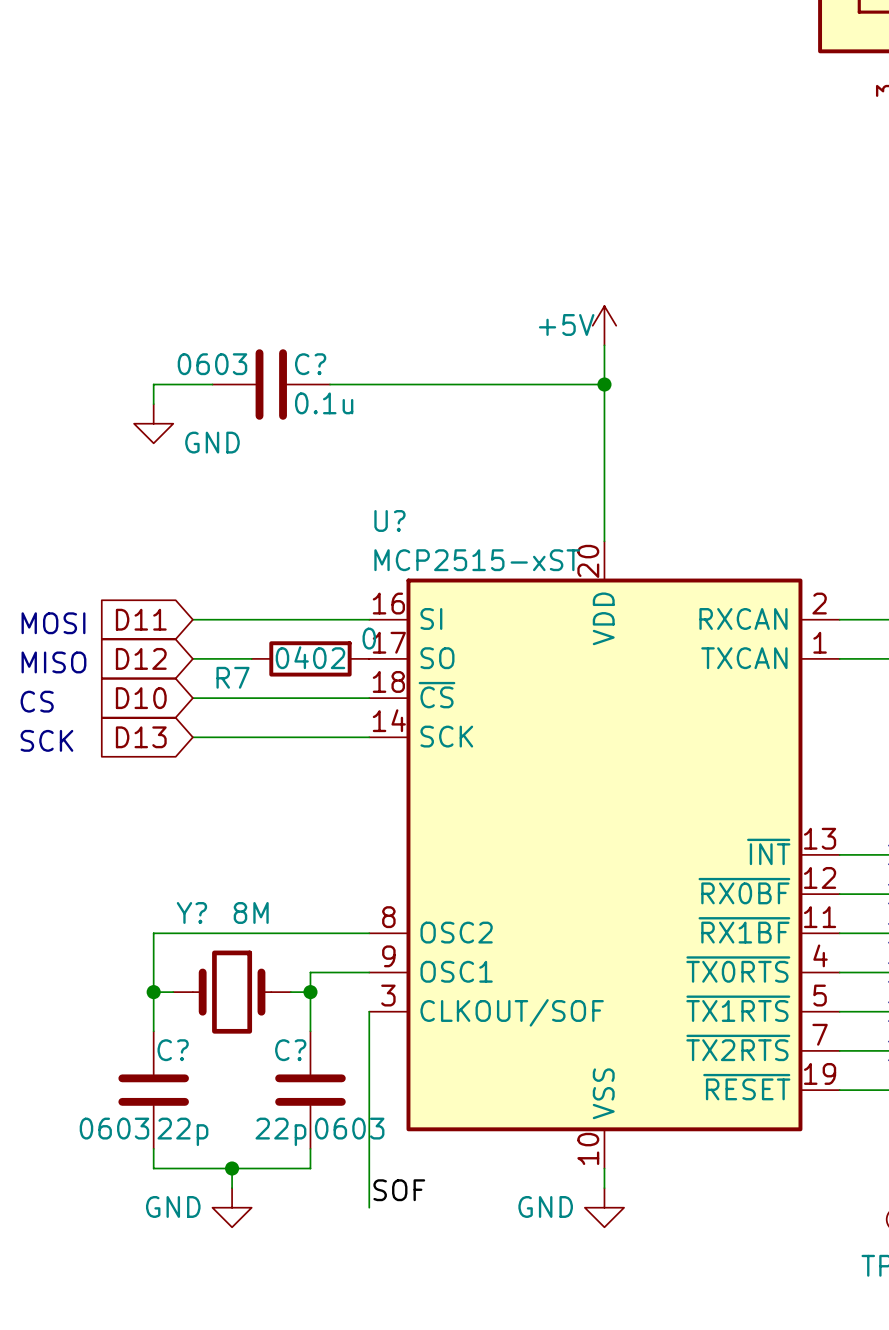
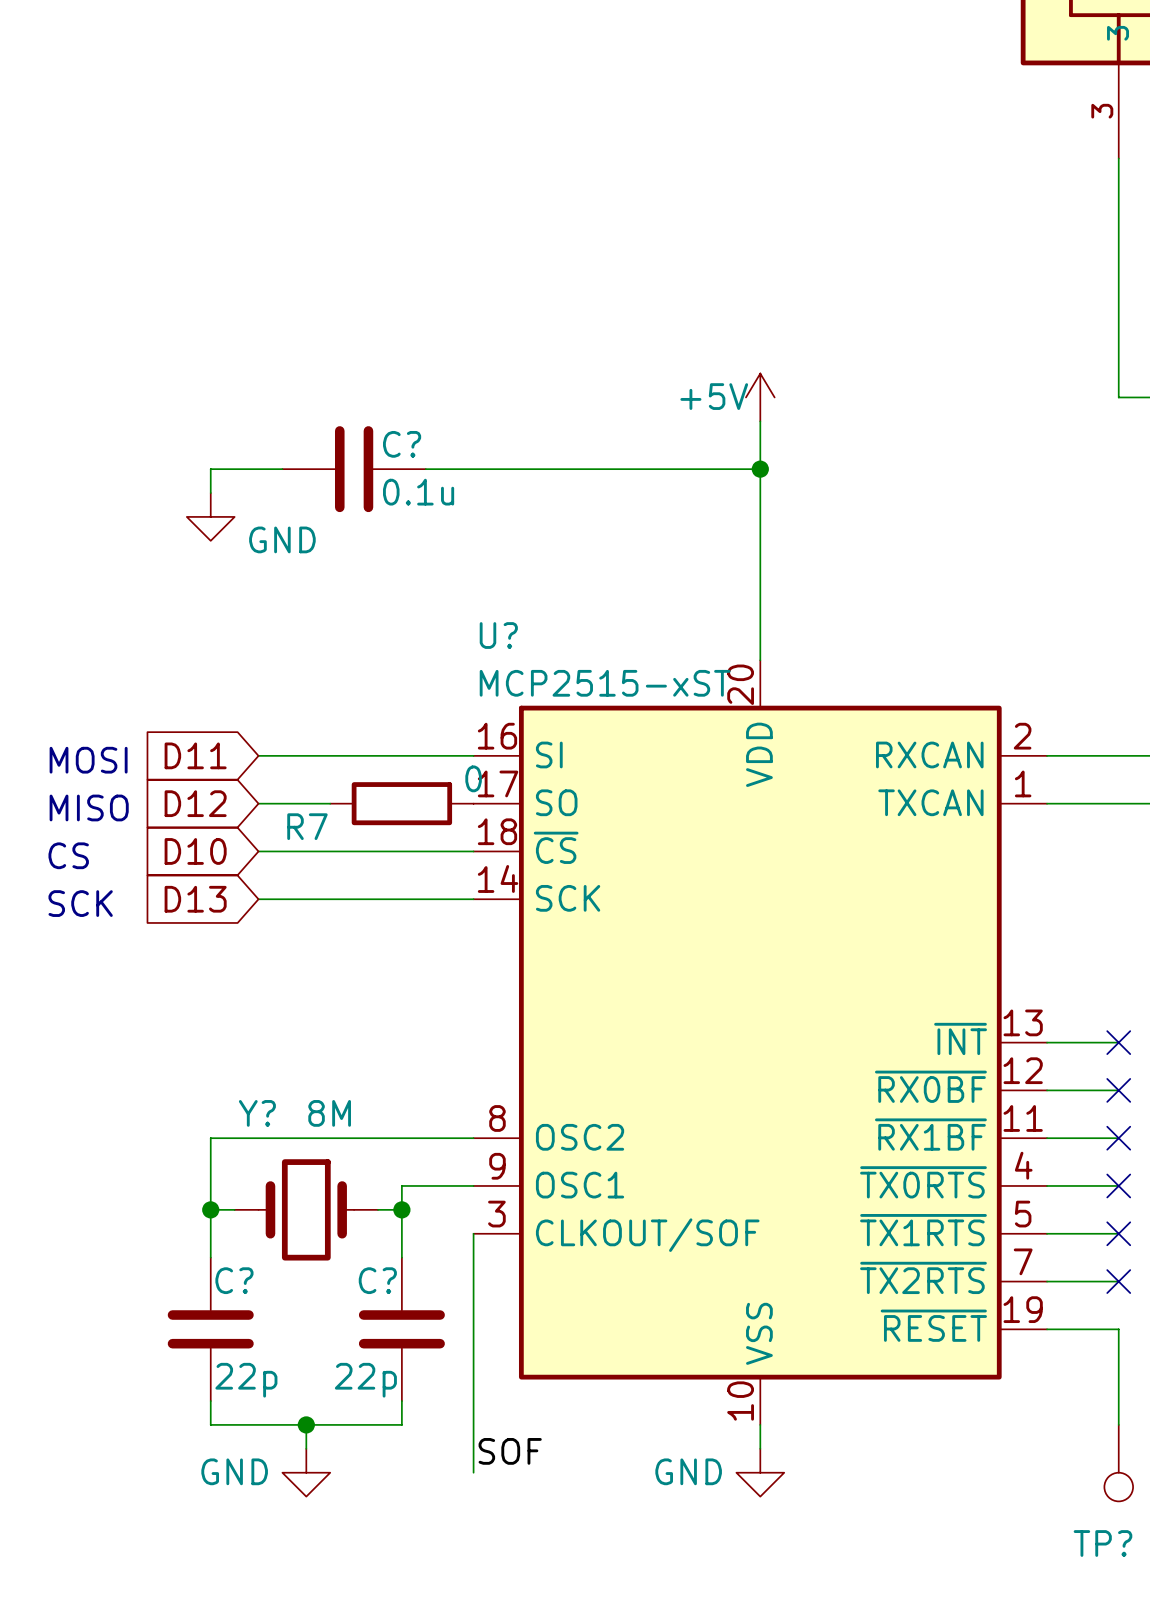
C? text: 0603 (212, 364) -> none
R7 text: 0402 (310, 657) -> none
C? text: 0603 (114, 1128) -> none
C? text: 0603 (349, 1128) -> none

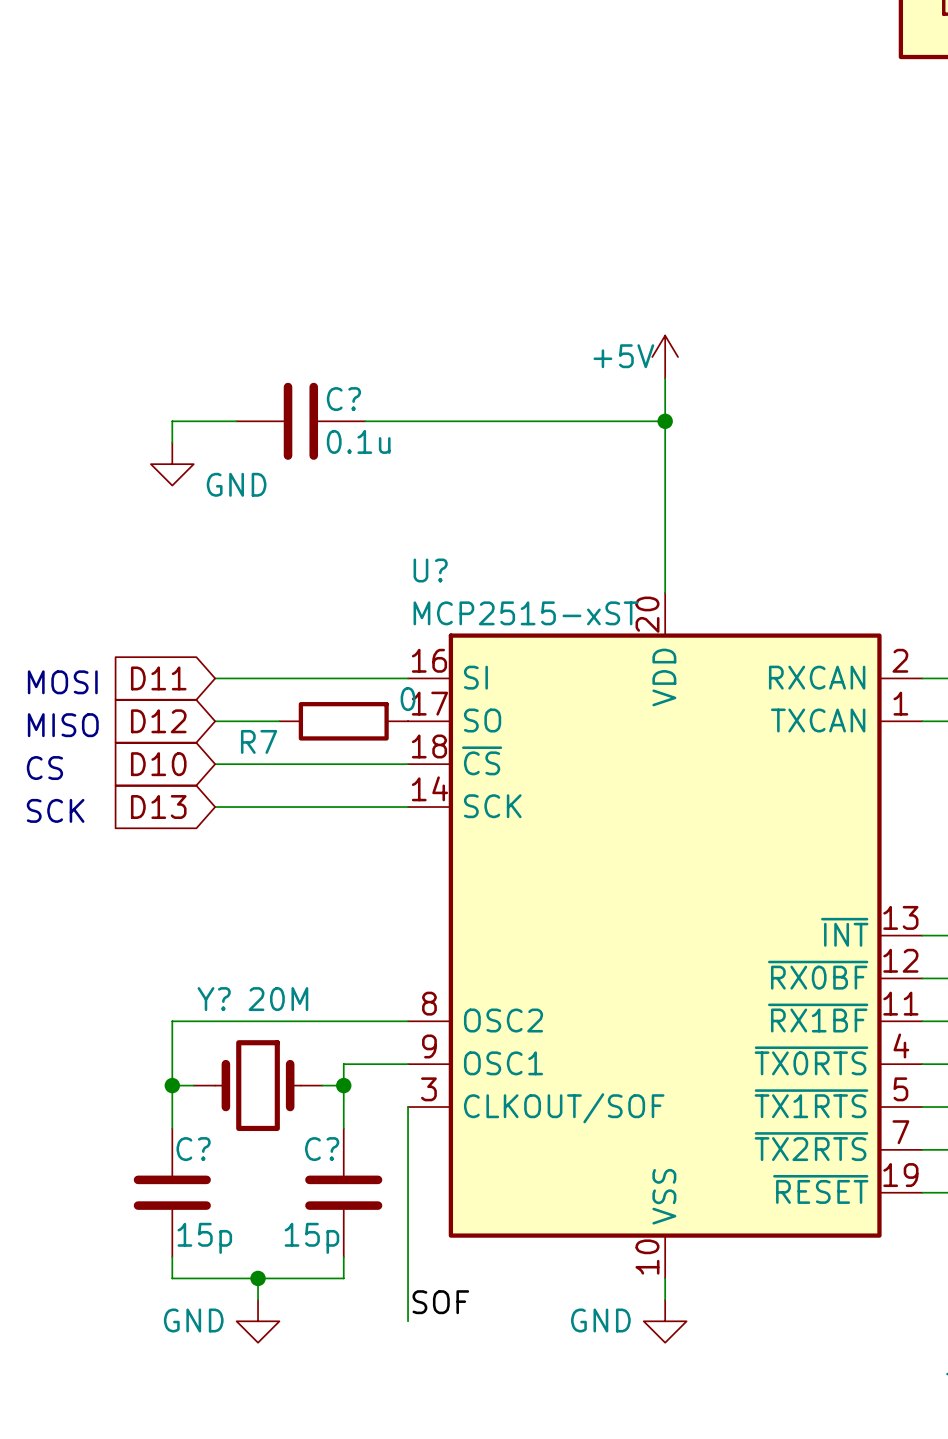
Y? value: 8M (329, 1113) -> 20M (278, 999)
C? value: 22p (246, 1380) -> 15p (204, 1238)
C? value: 22p (365, 1380) -> 15p (311, 1238)

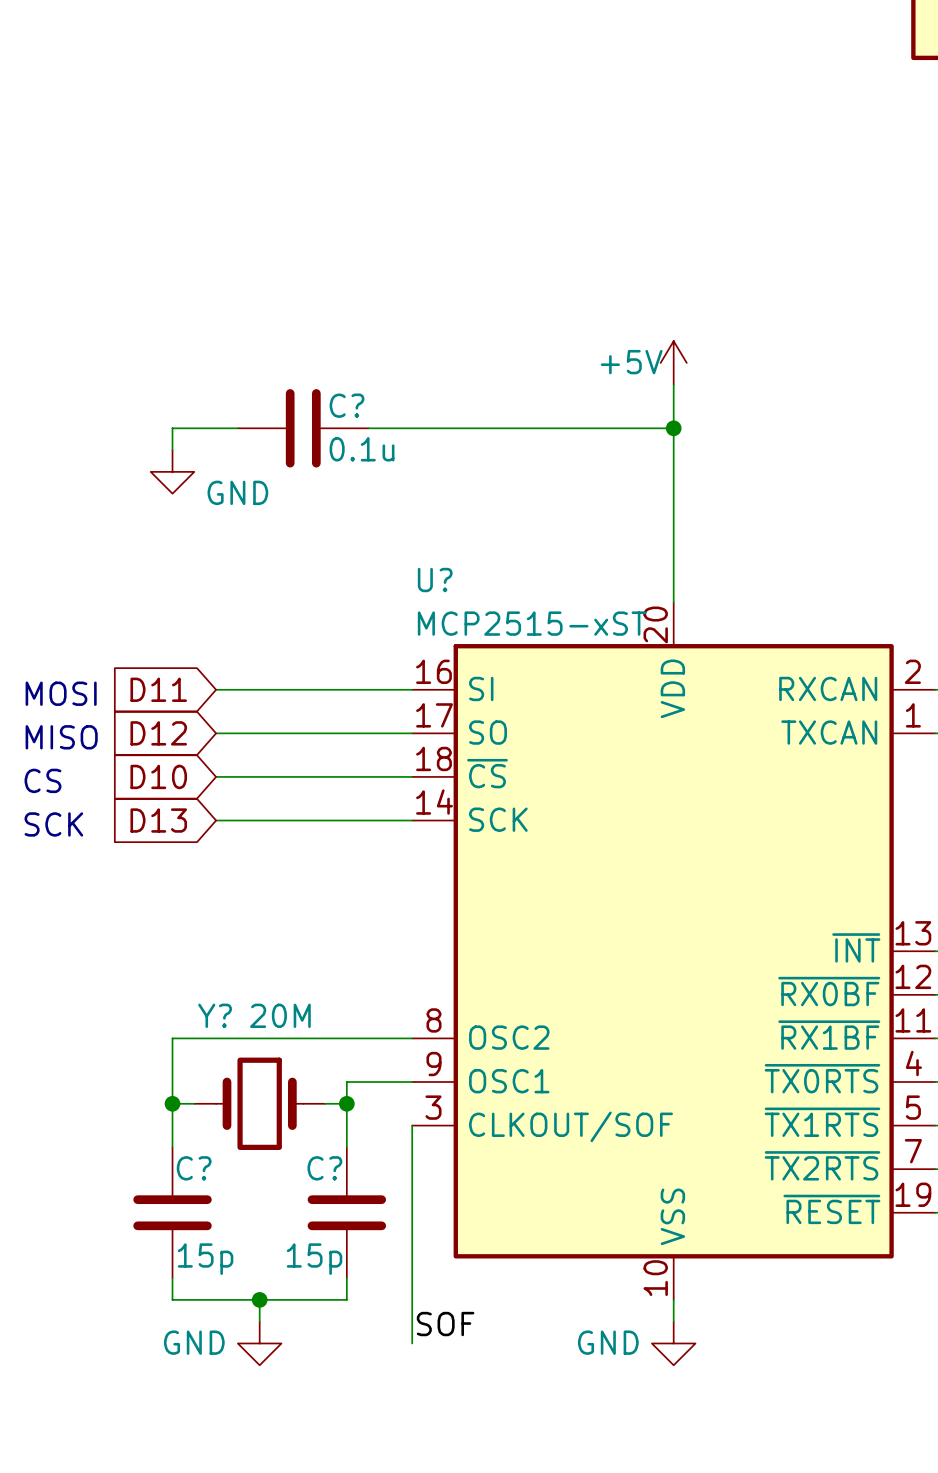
wire: none -> (281, 733) (412, 733)
R7: 0 (343, 721) -> none

